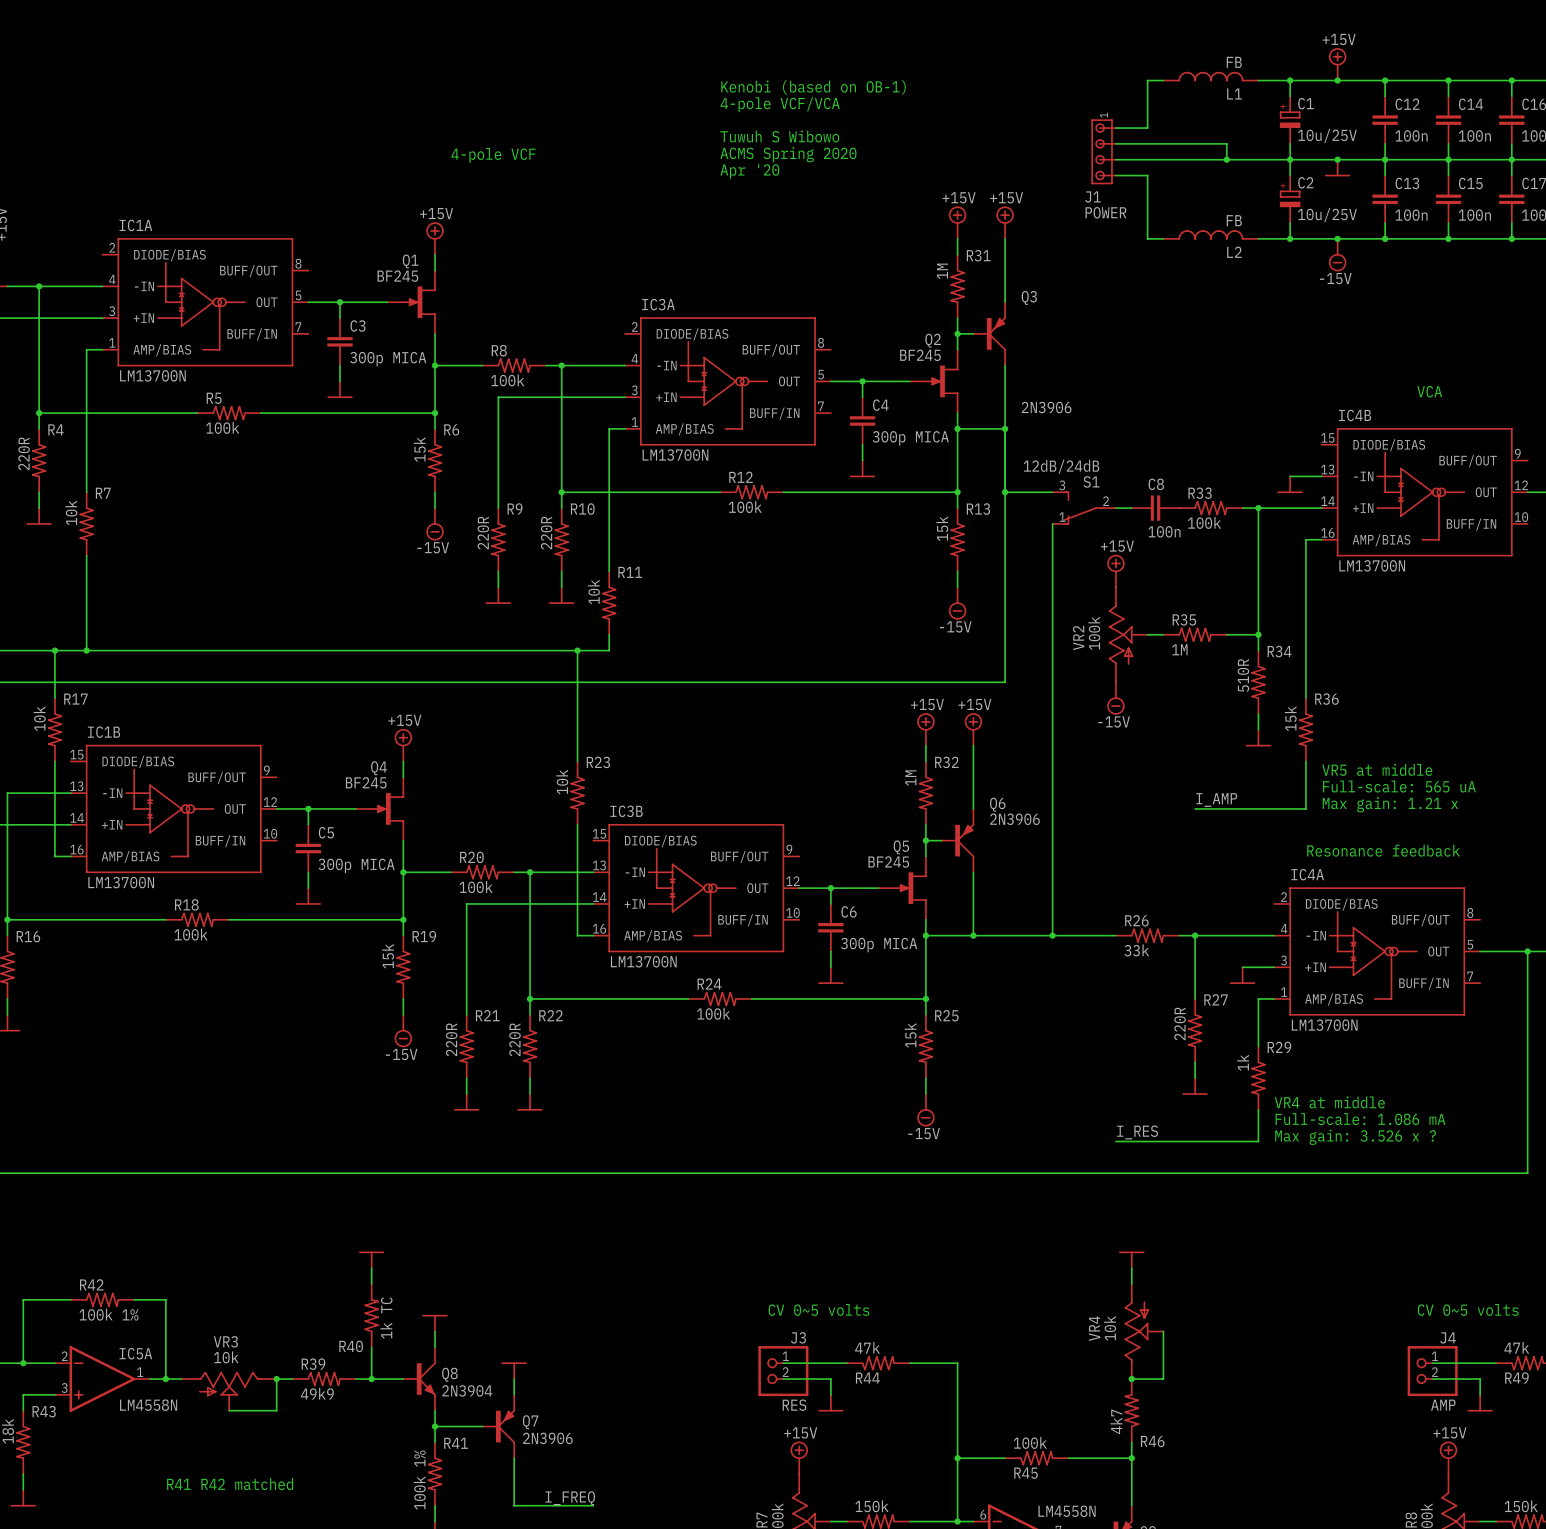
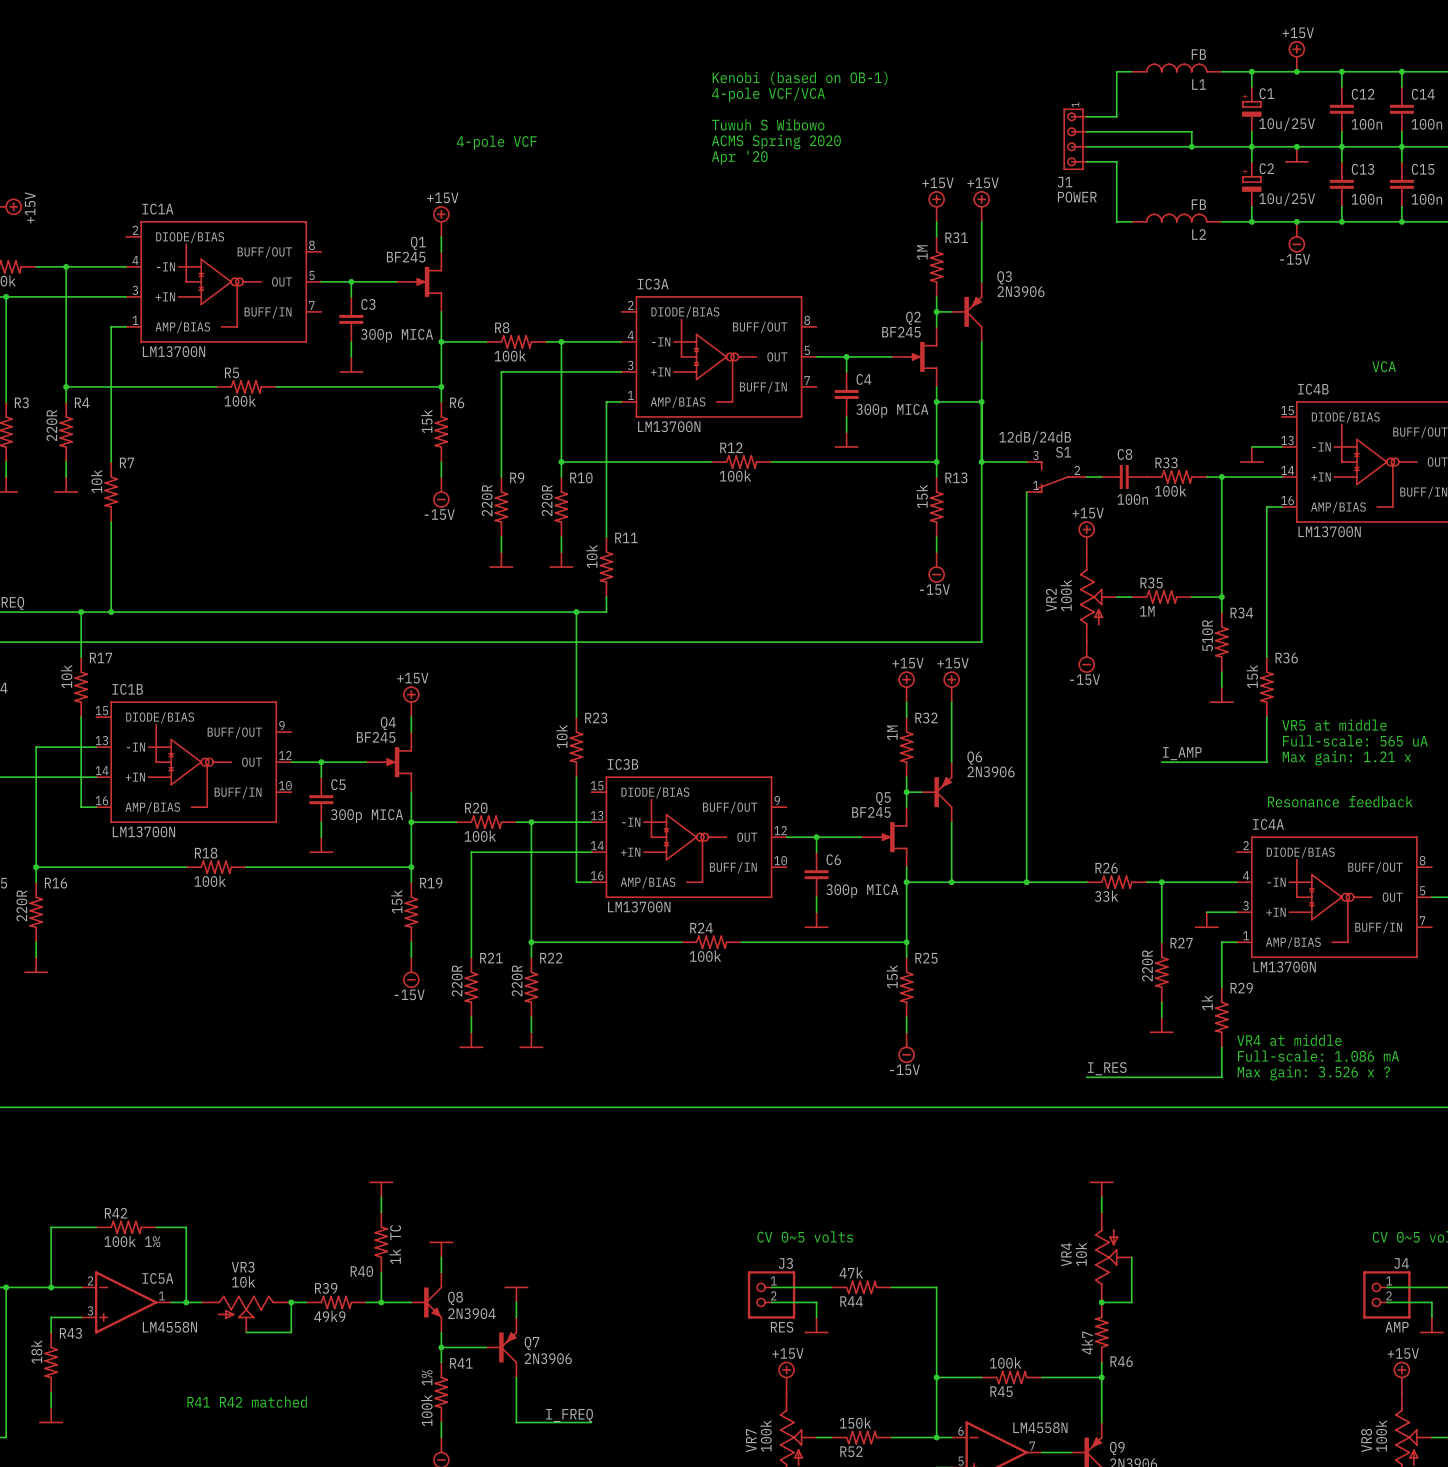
Q3 value position: 2N3906 (1046, 407) -> 2N3906 (1021, 291)

